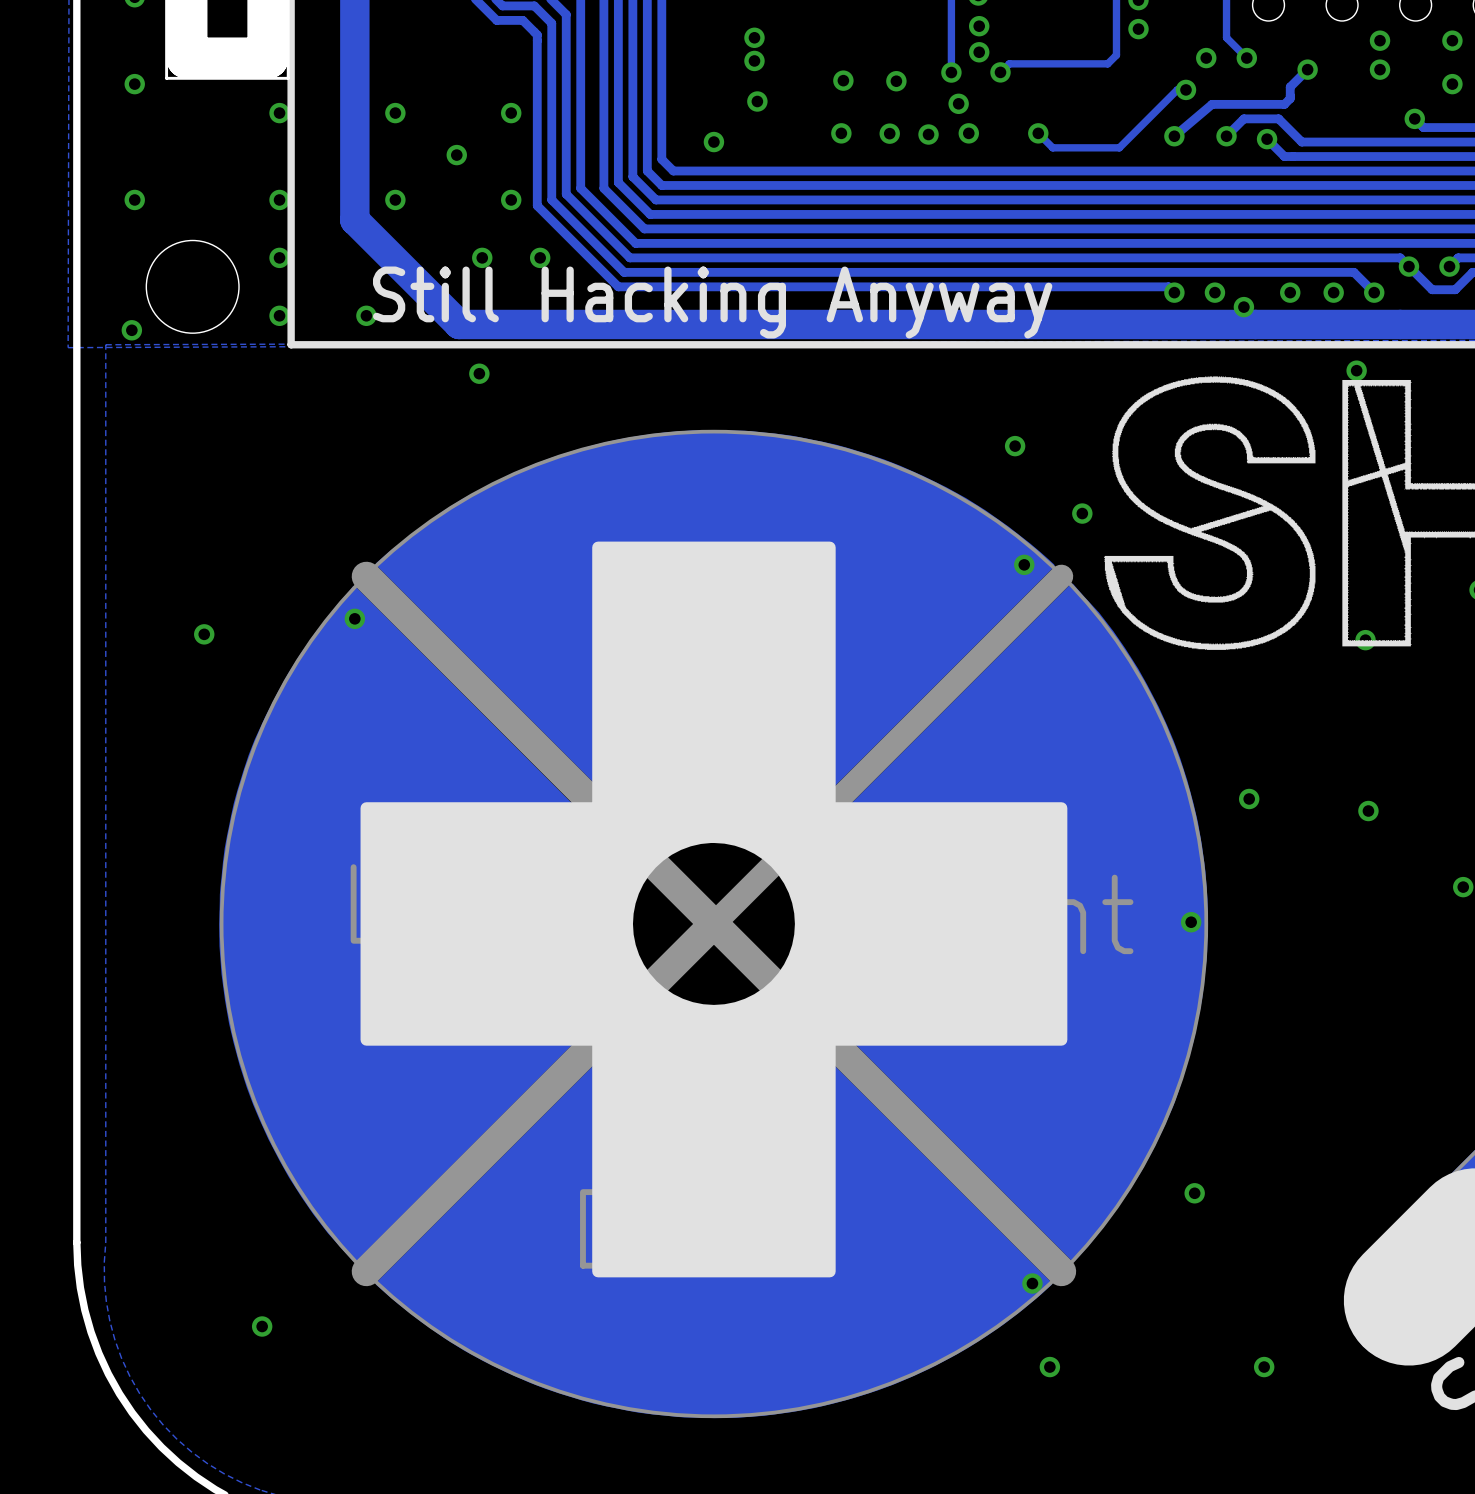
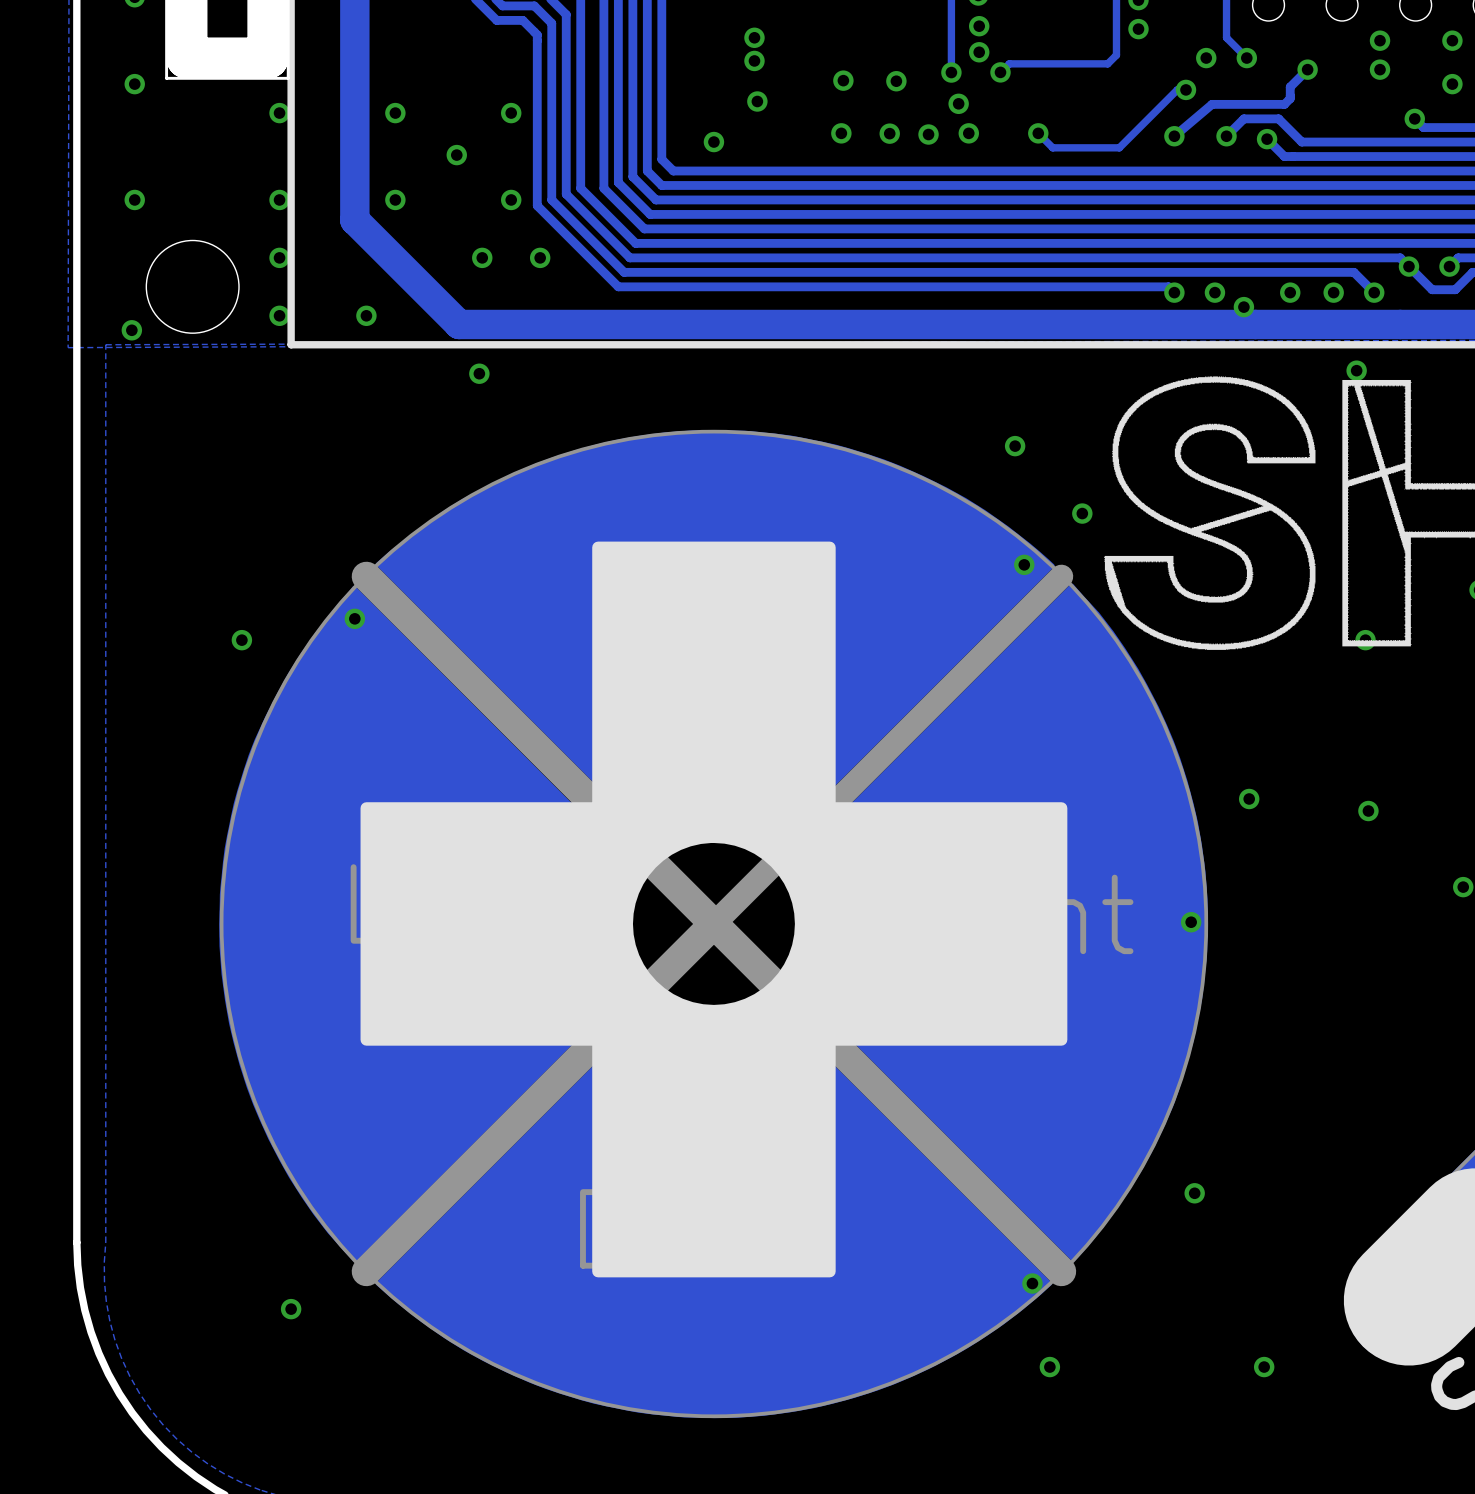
text: Still Hacking Anyway (712, 302) -> none
part position: (204, 634) -> (241, 640)
part position: (262, 1326) -> (291, 1309)

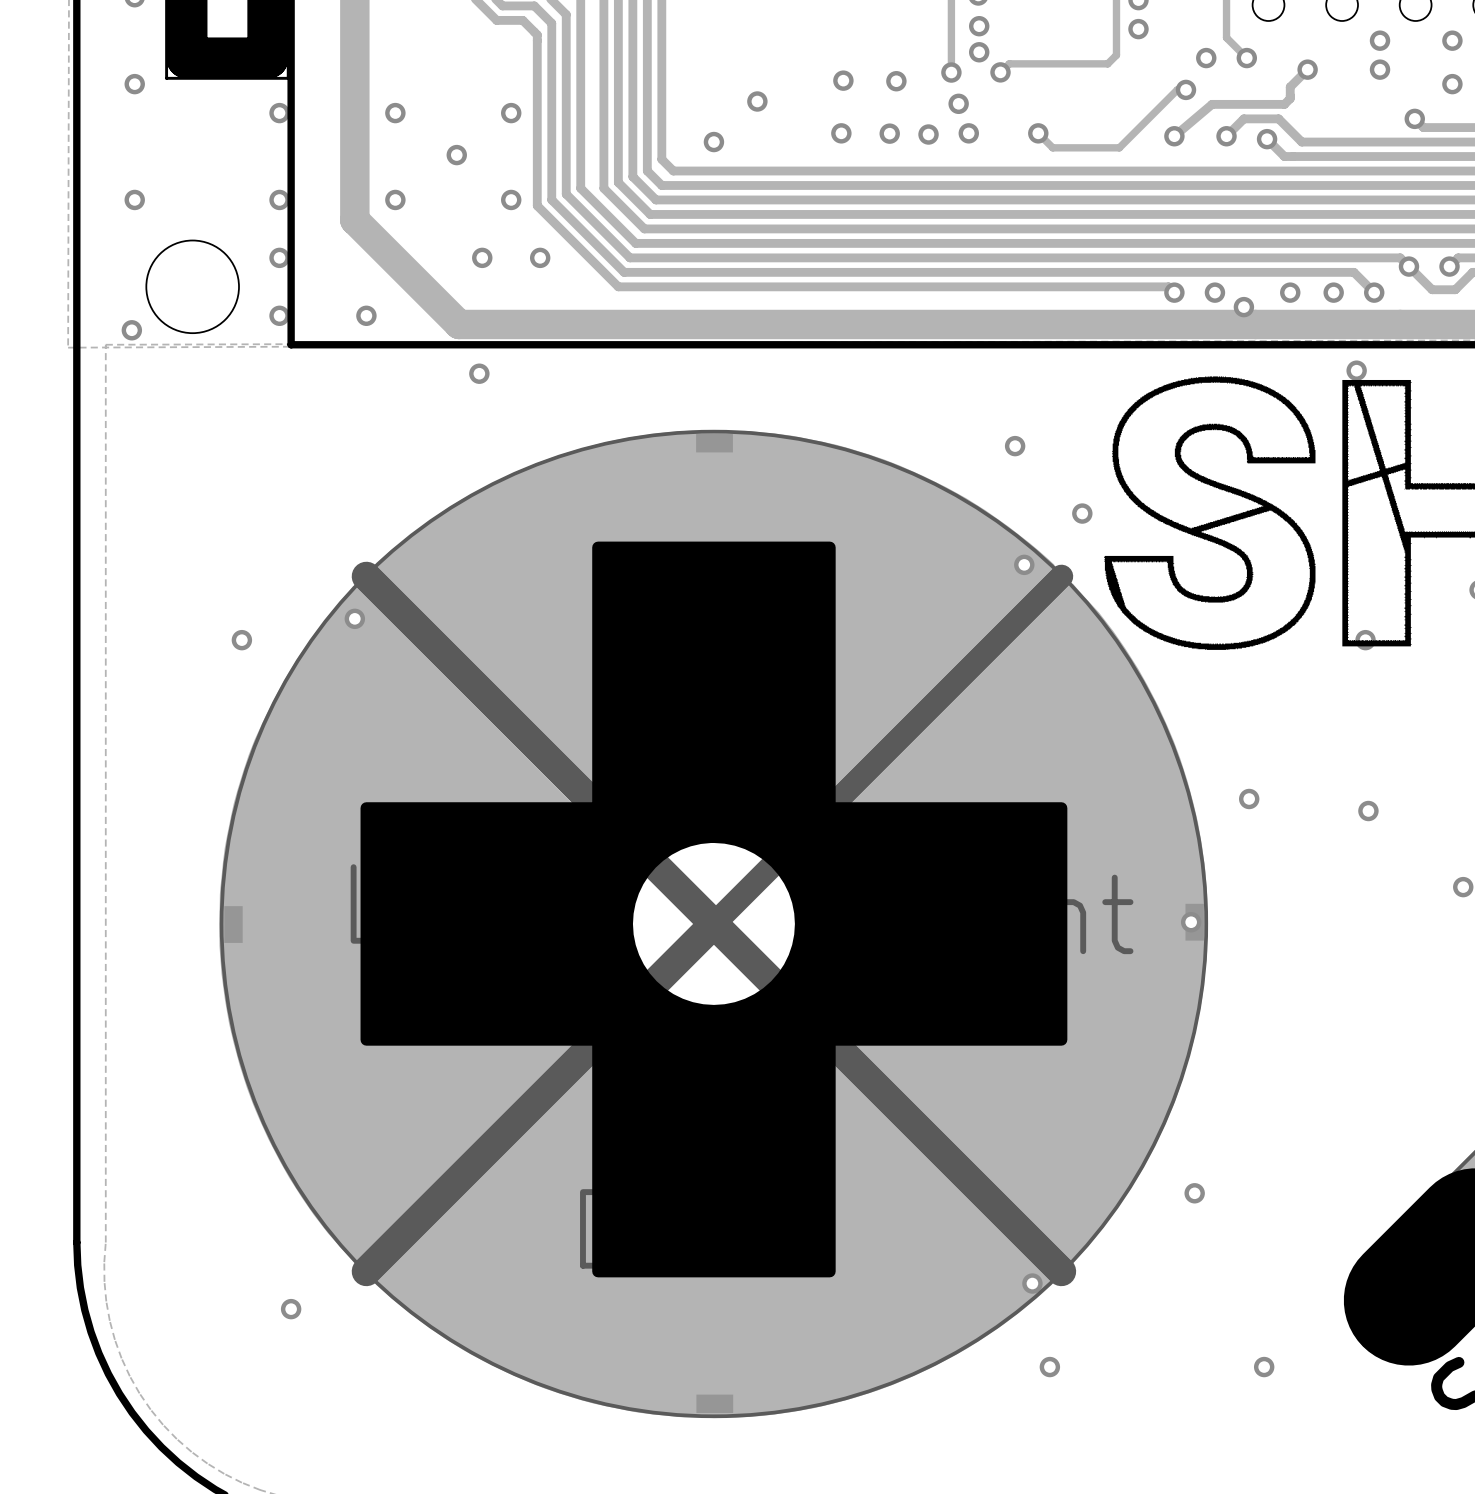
via: (754, 37) -> none
via: (754, 60) -> none

